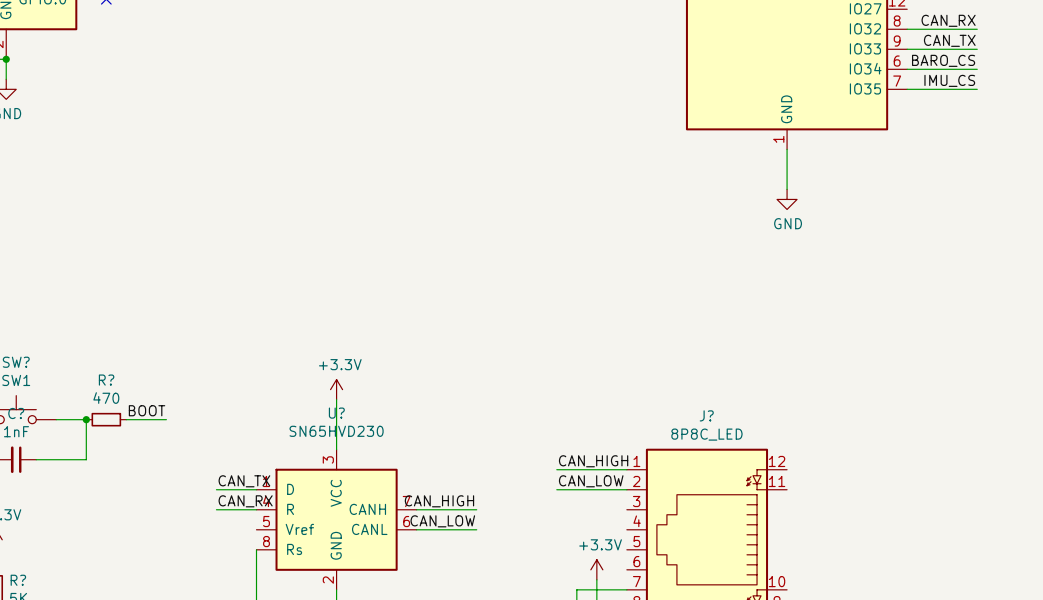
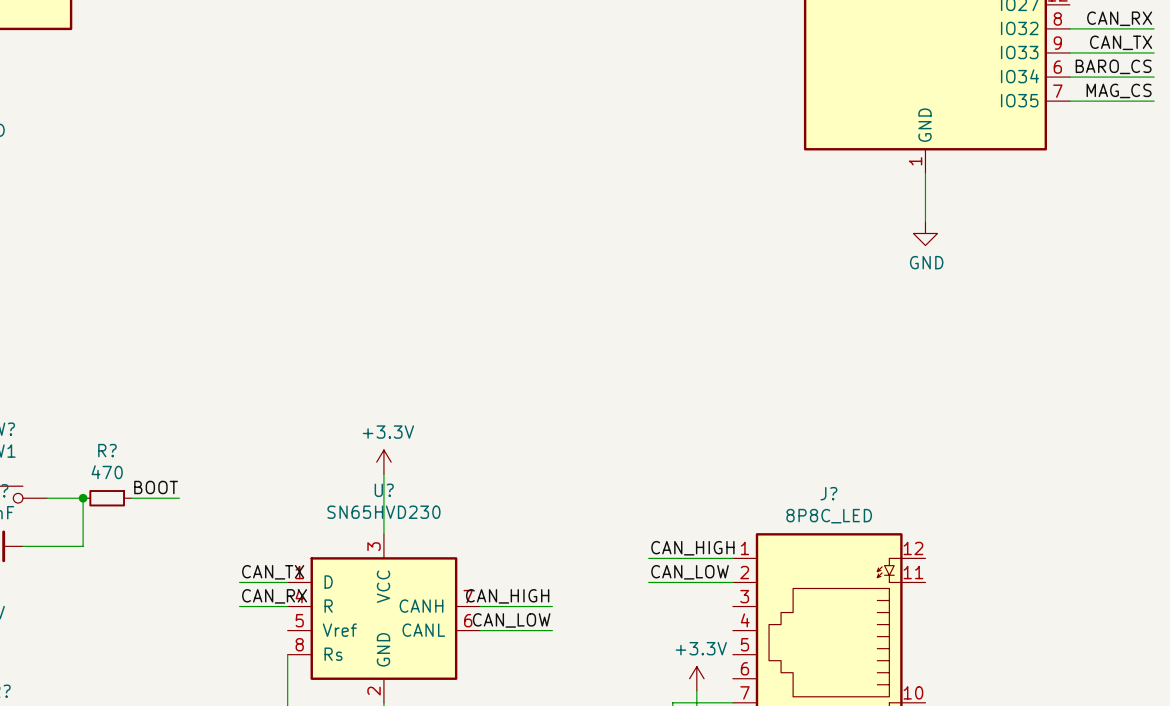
label: IMU_CS (949, 80) -> MAG_CS (1119, 90)

